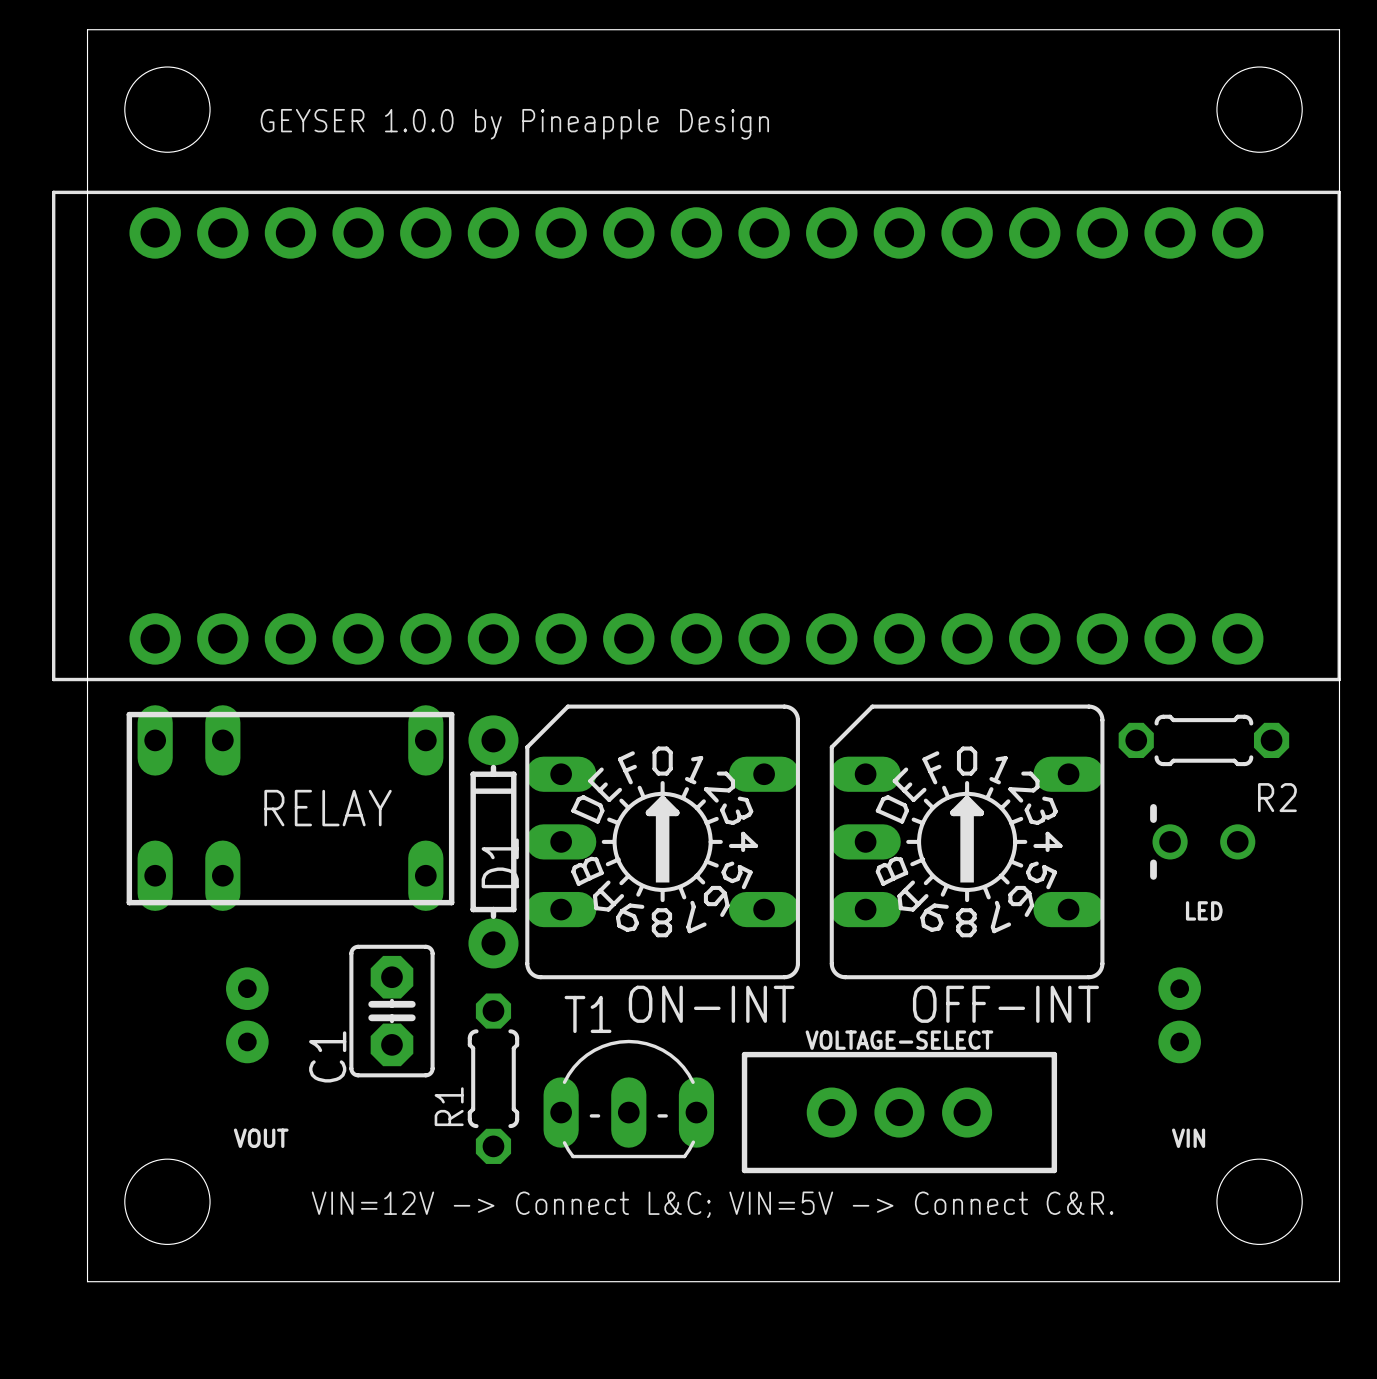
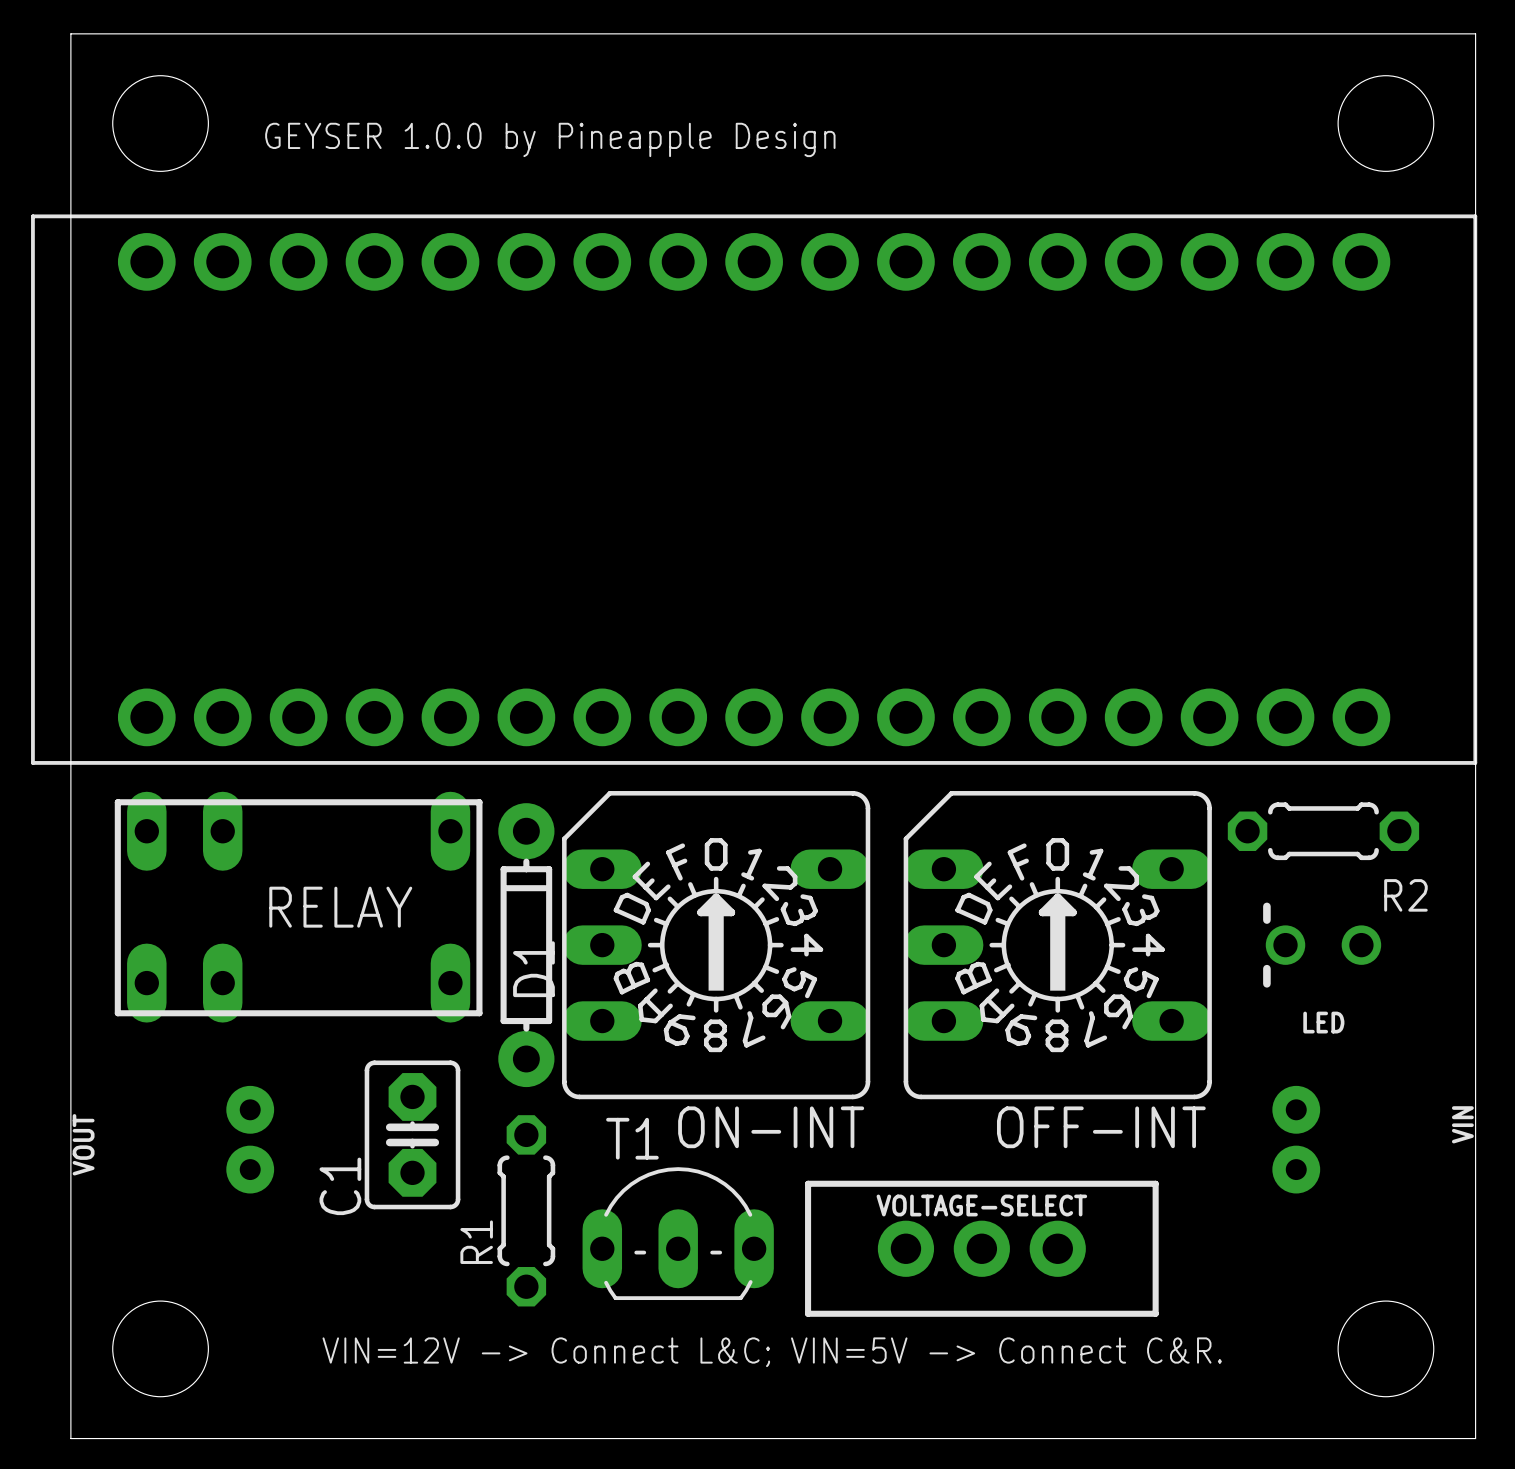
VOLTAGE-SELECT name position: VOLTAGE-SELECT (899, 1040) -> VOLTAGE-SELECT (981, 1205)
VOUT name rotation: 0° (261, 1138) -> 90° counterclockwise (83, 1144)
VOUT name position: VOUT (261, 1138) -> VOUT (83, 1144)
VIN name rotation: 0° (1188, 1138) -> 90° counterclockwise (1462, 1124)
VIN name position: VIN (1188, 1138) -> VIN (1462, 1124)

